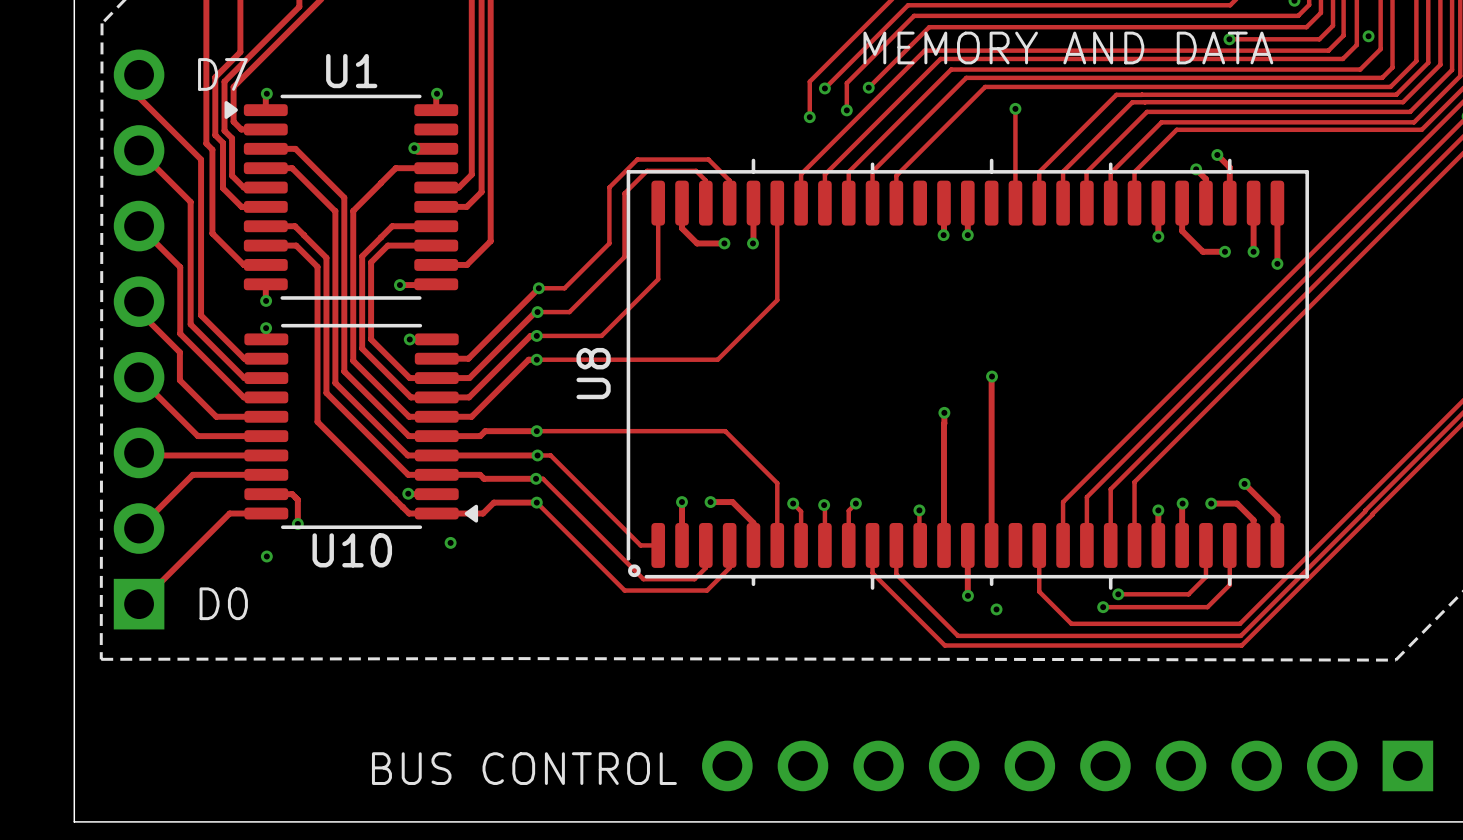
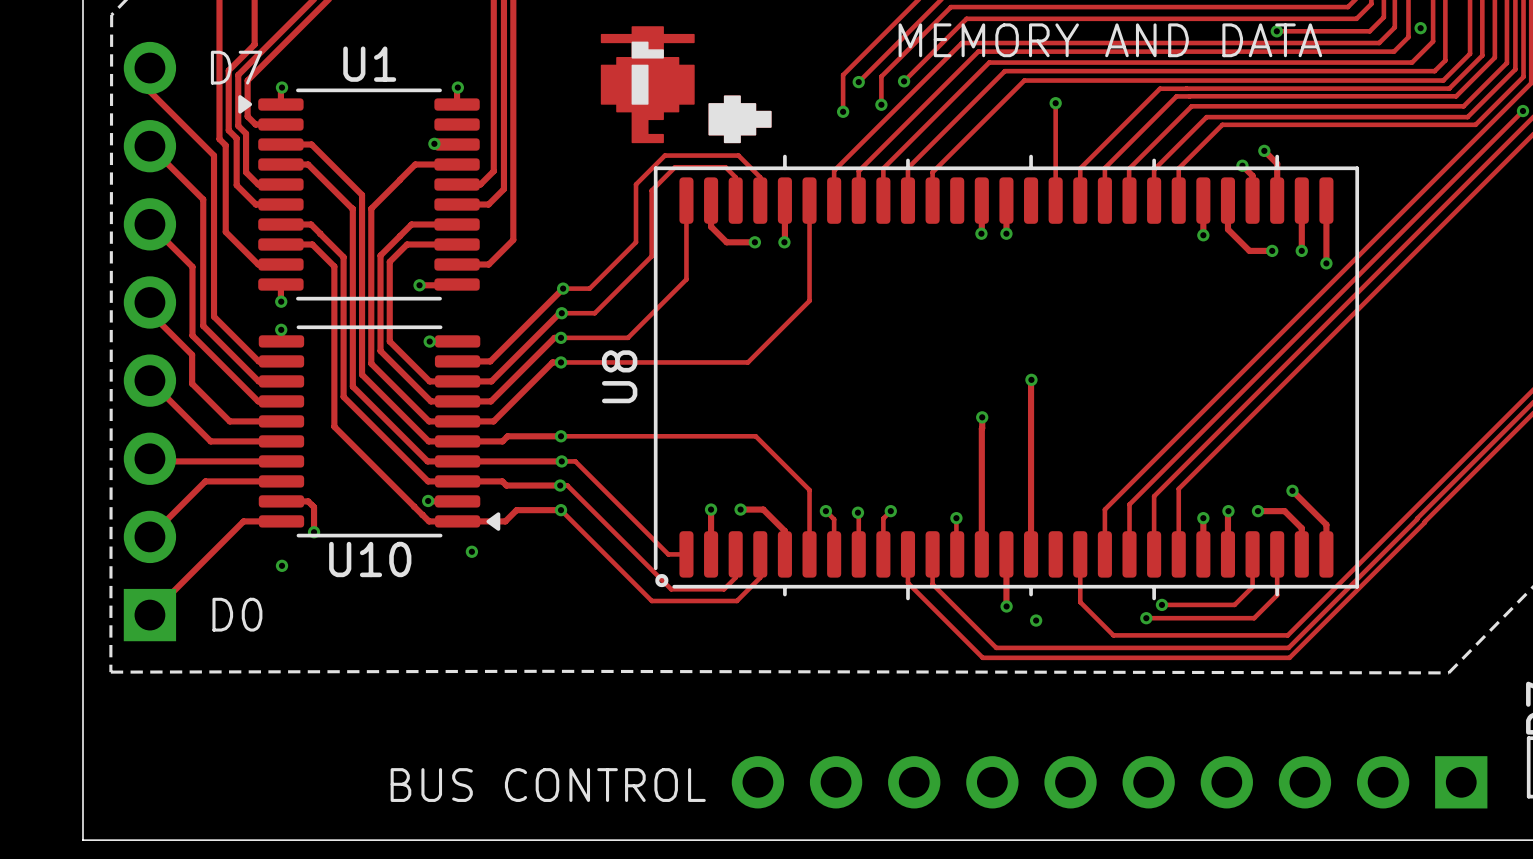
drawing: none -> [600, 26, 772, 144]

